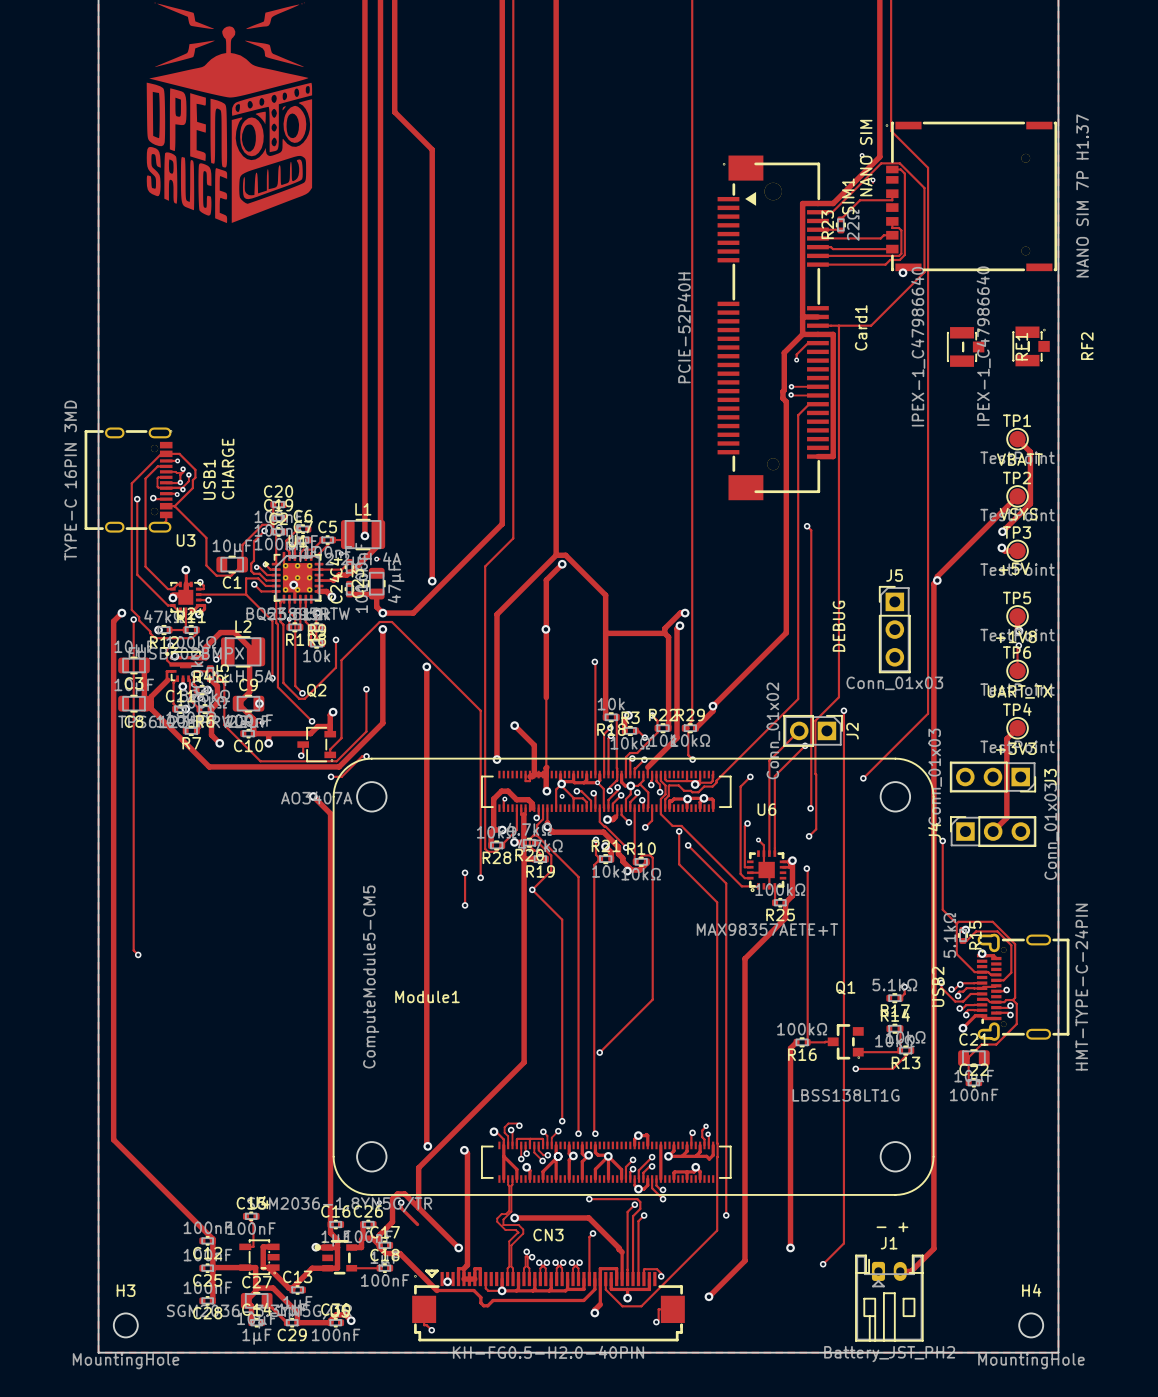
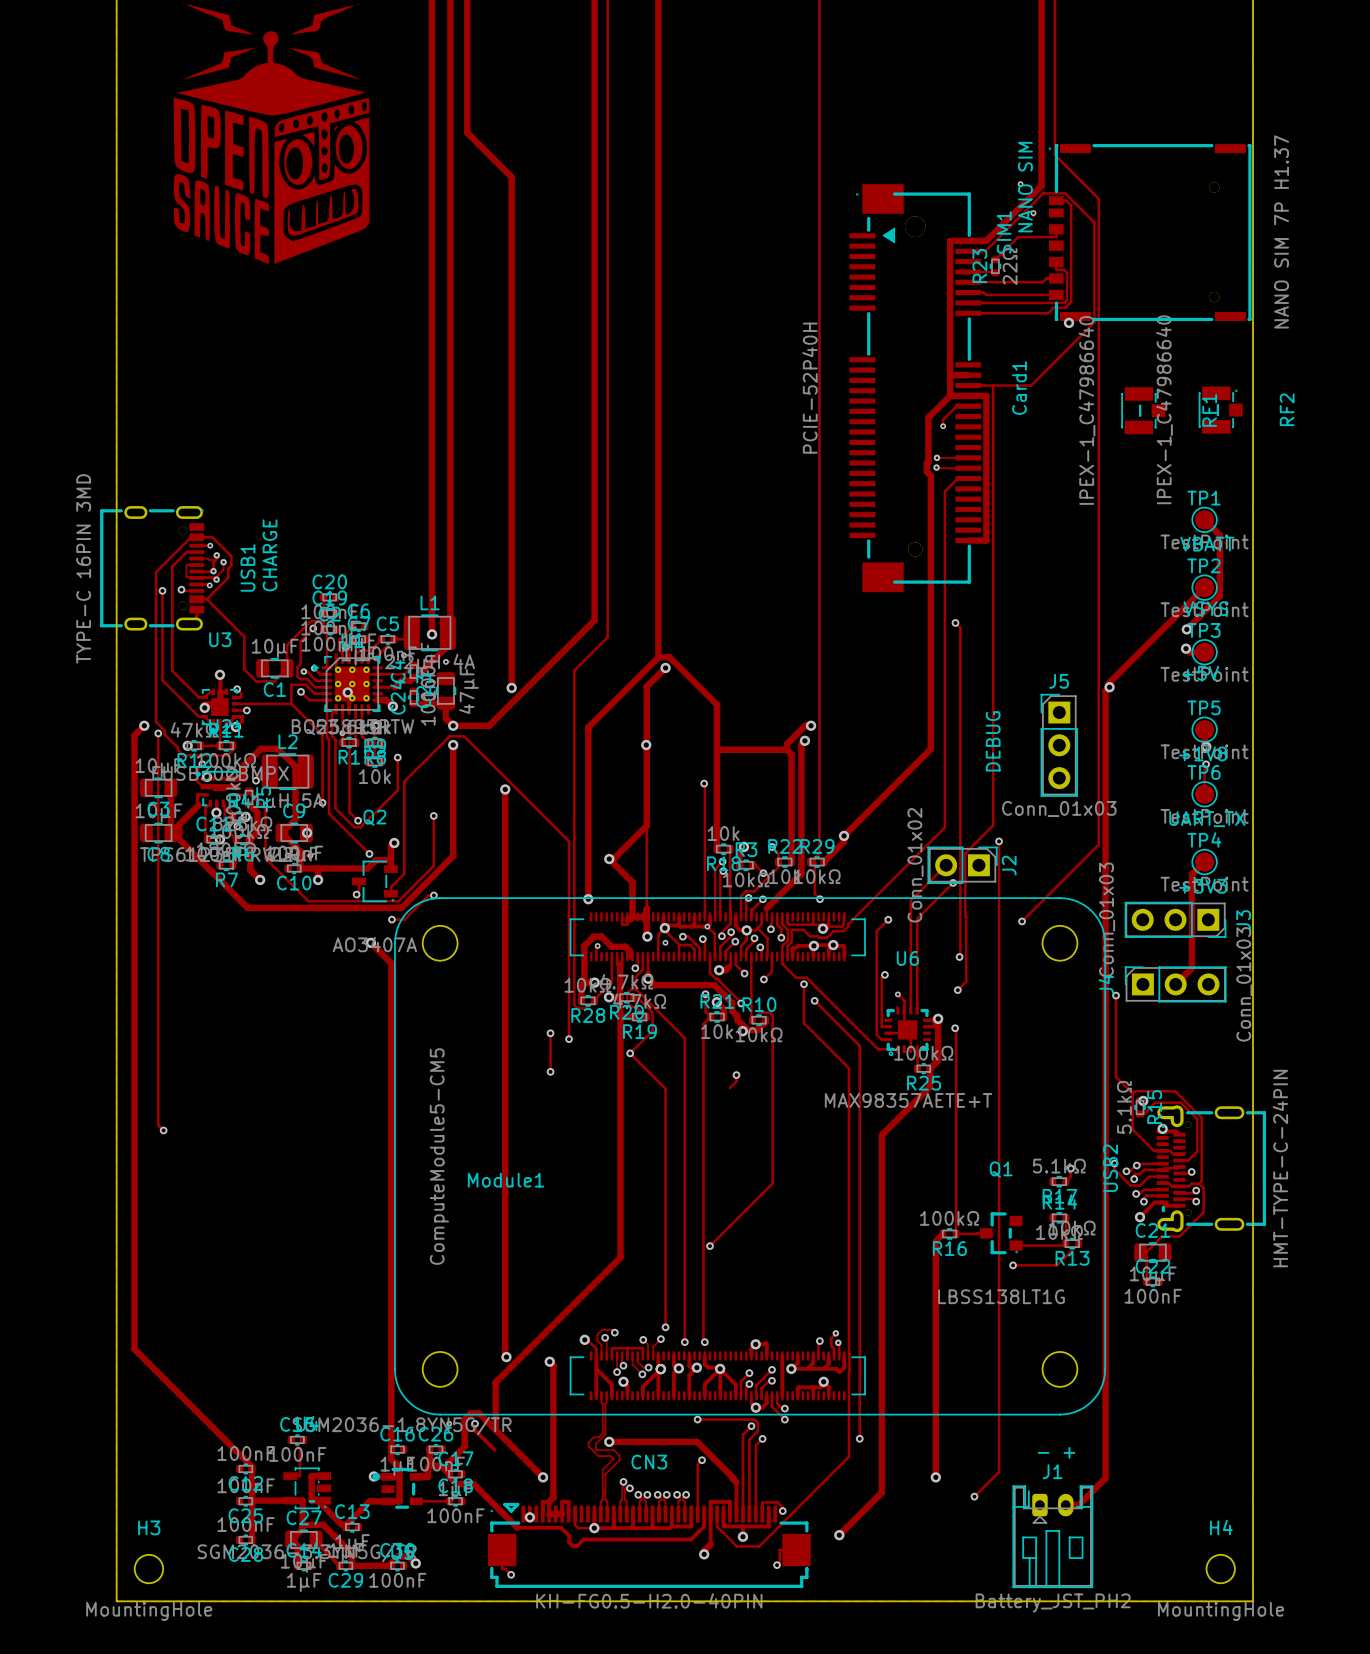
track: none -> (646, 825) (613, 859) (609, 859)
track: none -> (736, 1075) (736, 1081) (730, 1088)
via: none -> (736, 1075)

